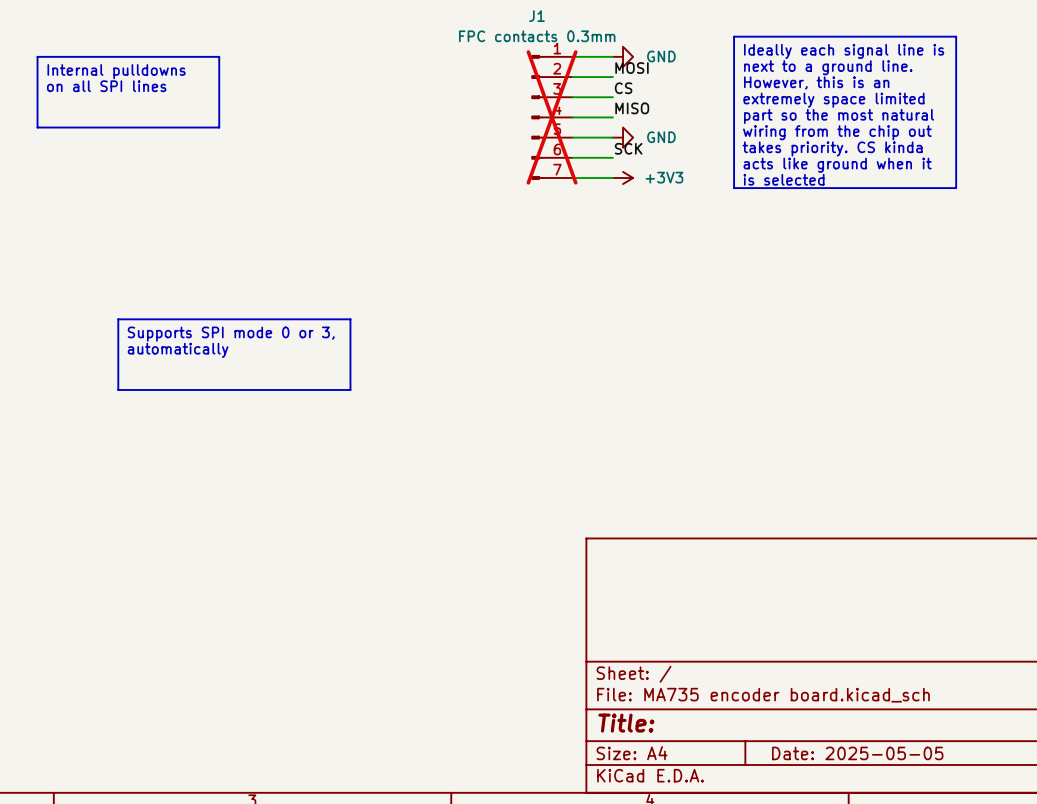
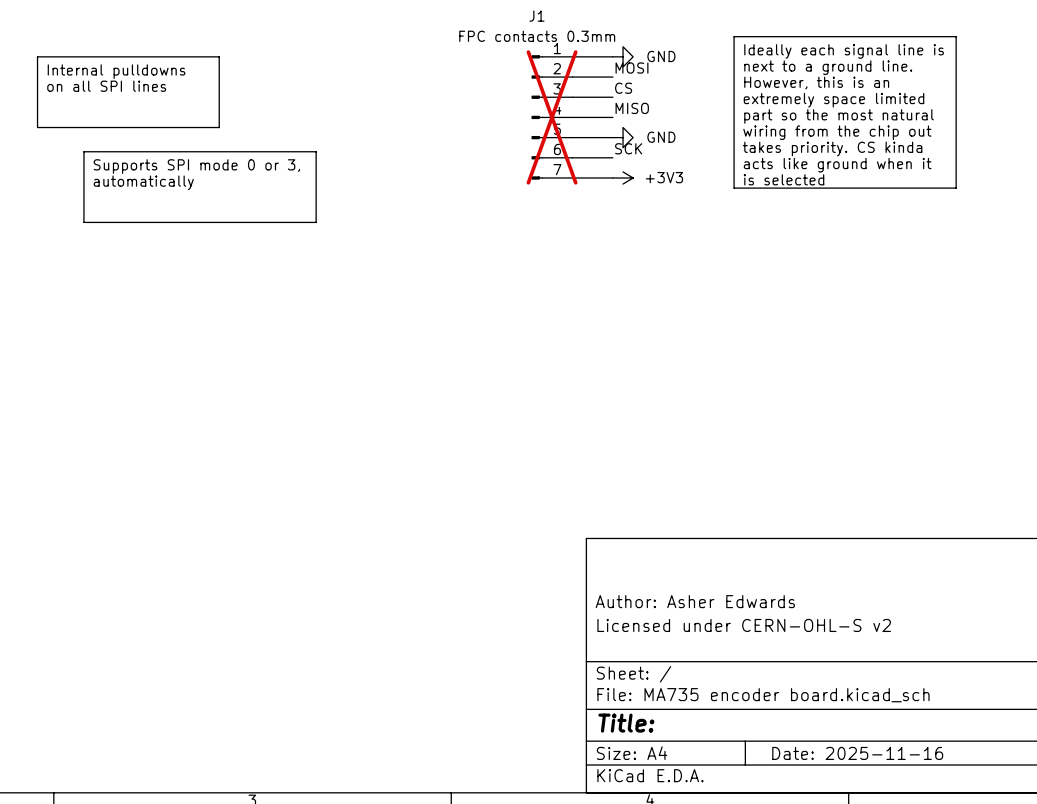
line: (118, 319) (350, 319) (350, 389) (118, 389) (118, 319) -> (83, 151) (316, 151) (316, 222) (83, 222) (83, 151)
text position: Supports SPI mode 0 or 3, (231, 334) -> Supports SPI mode 0 or 3, (196, 166)
text position: automatically (178, 350) -> automatically (143, 182)
title block: none -> Author: Asher Edwards (695, 601)
title block: none -> Licensed under CERN-OHL-S v2 (744, 625)
title block: Date: 2025-05-05 (857, 753) -> Date: 2025-11-16 (857, 753)

